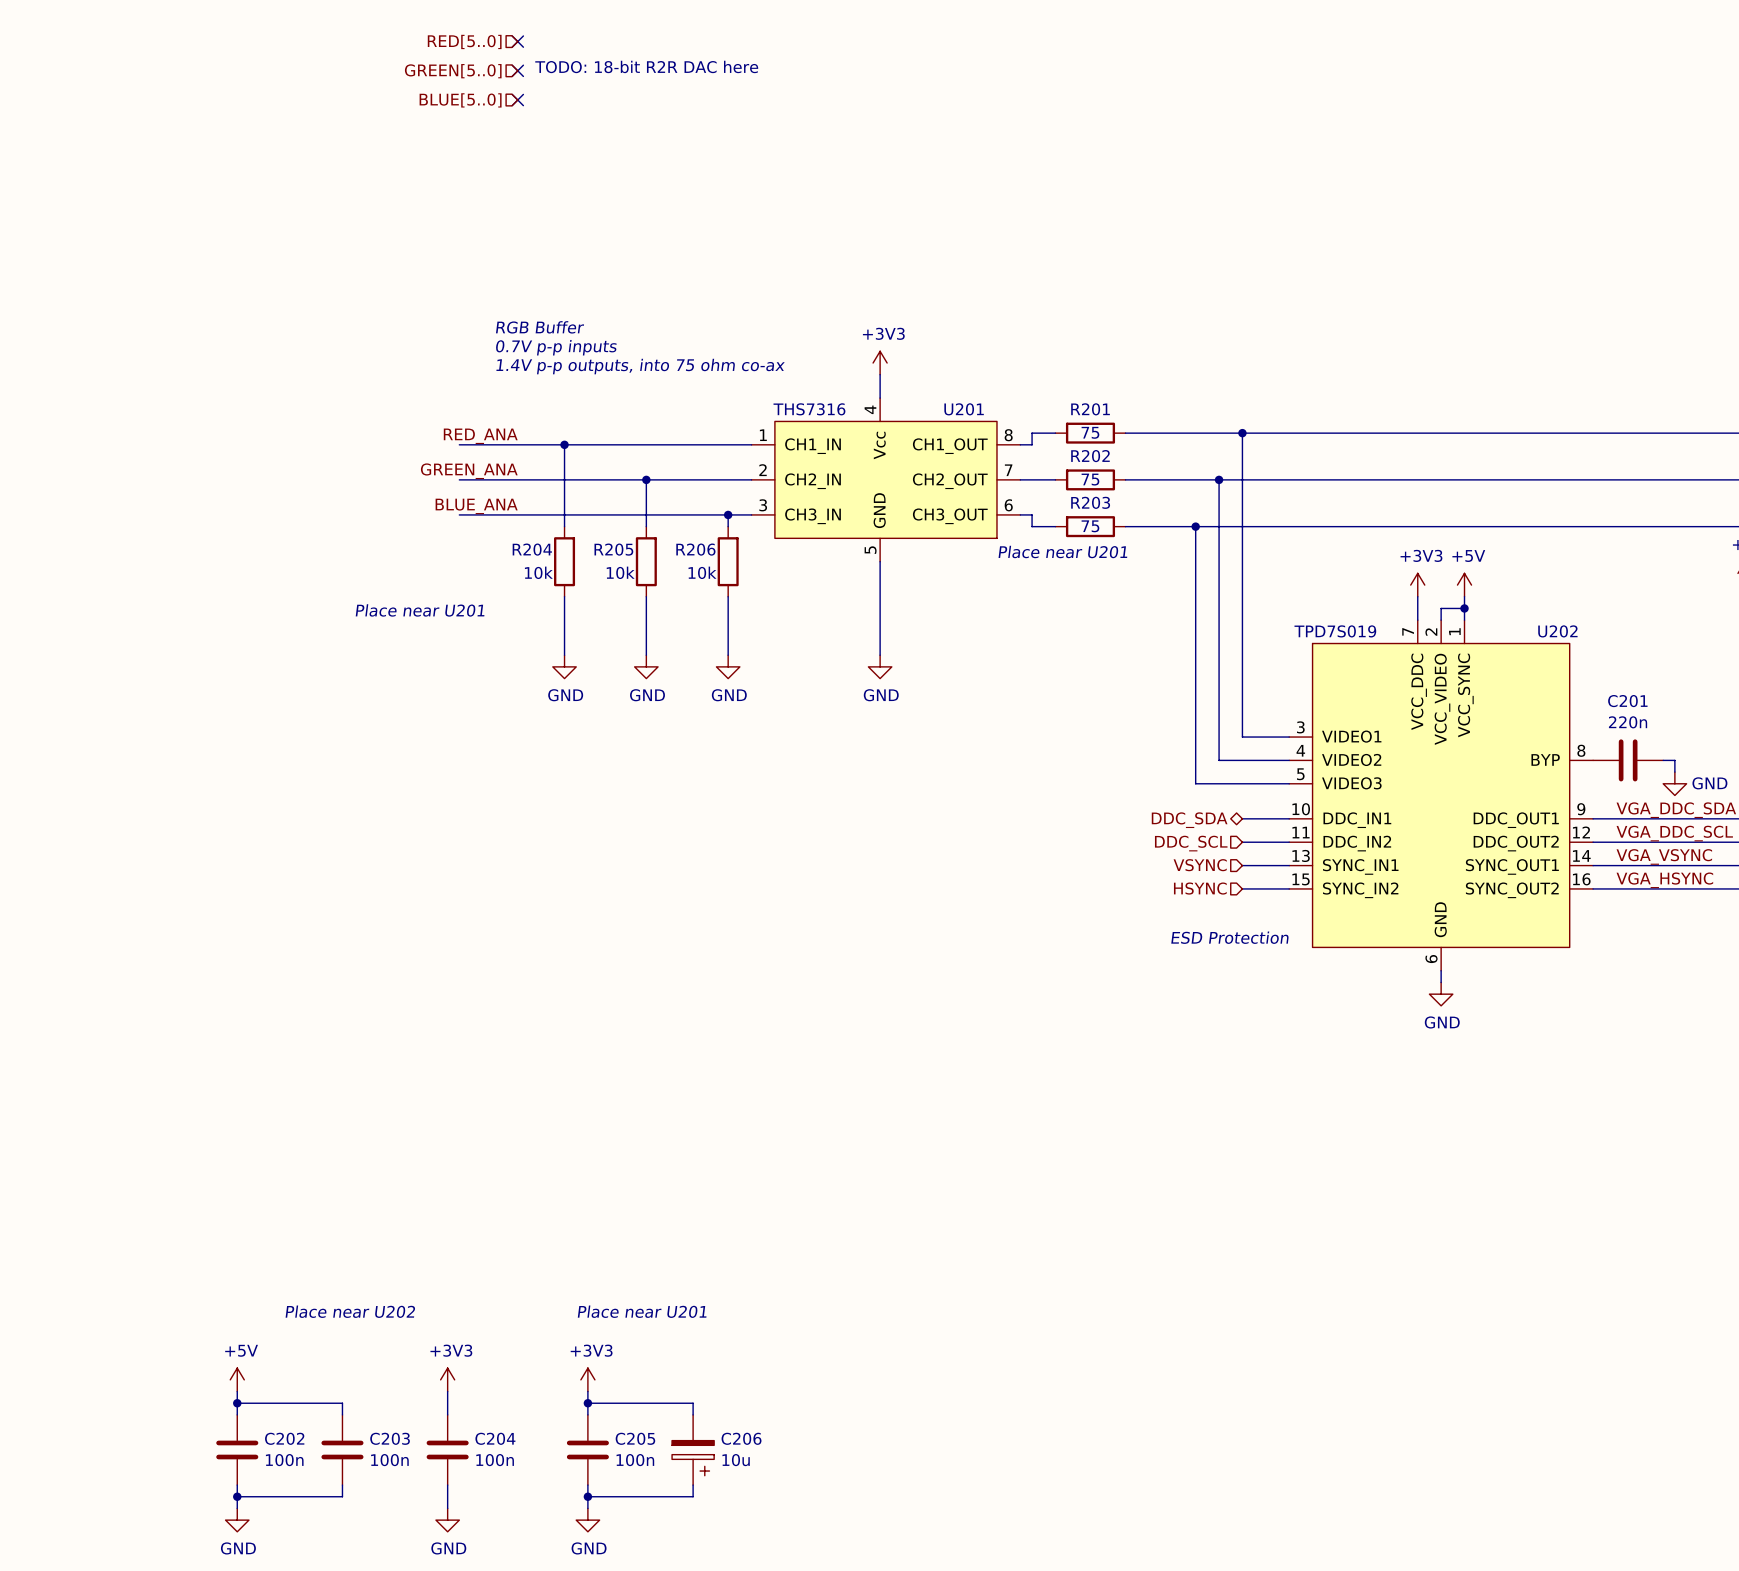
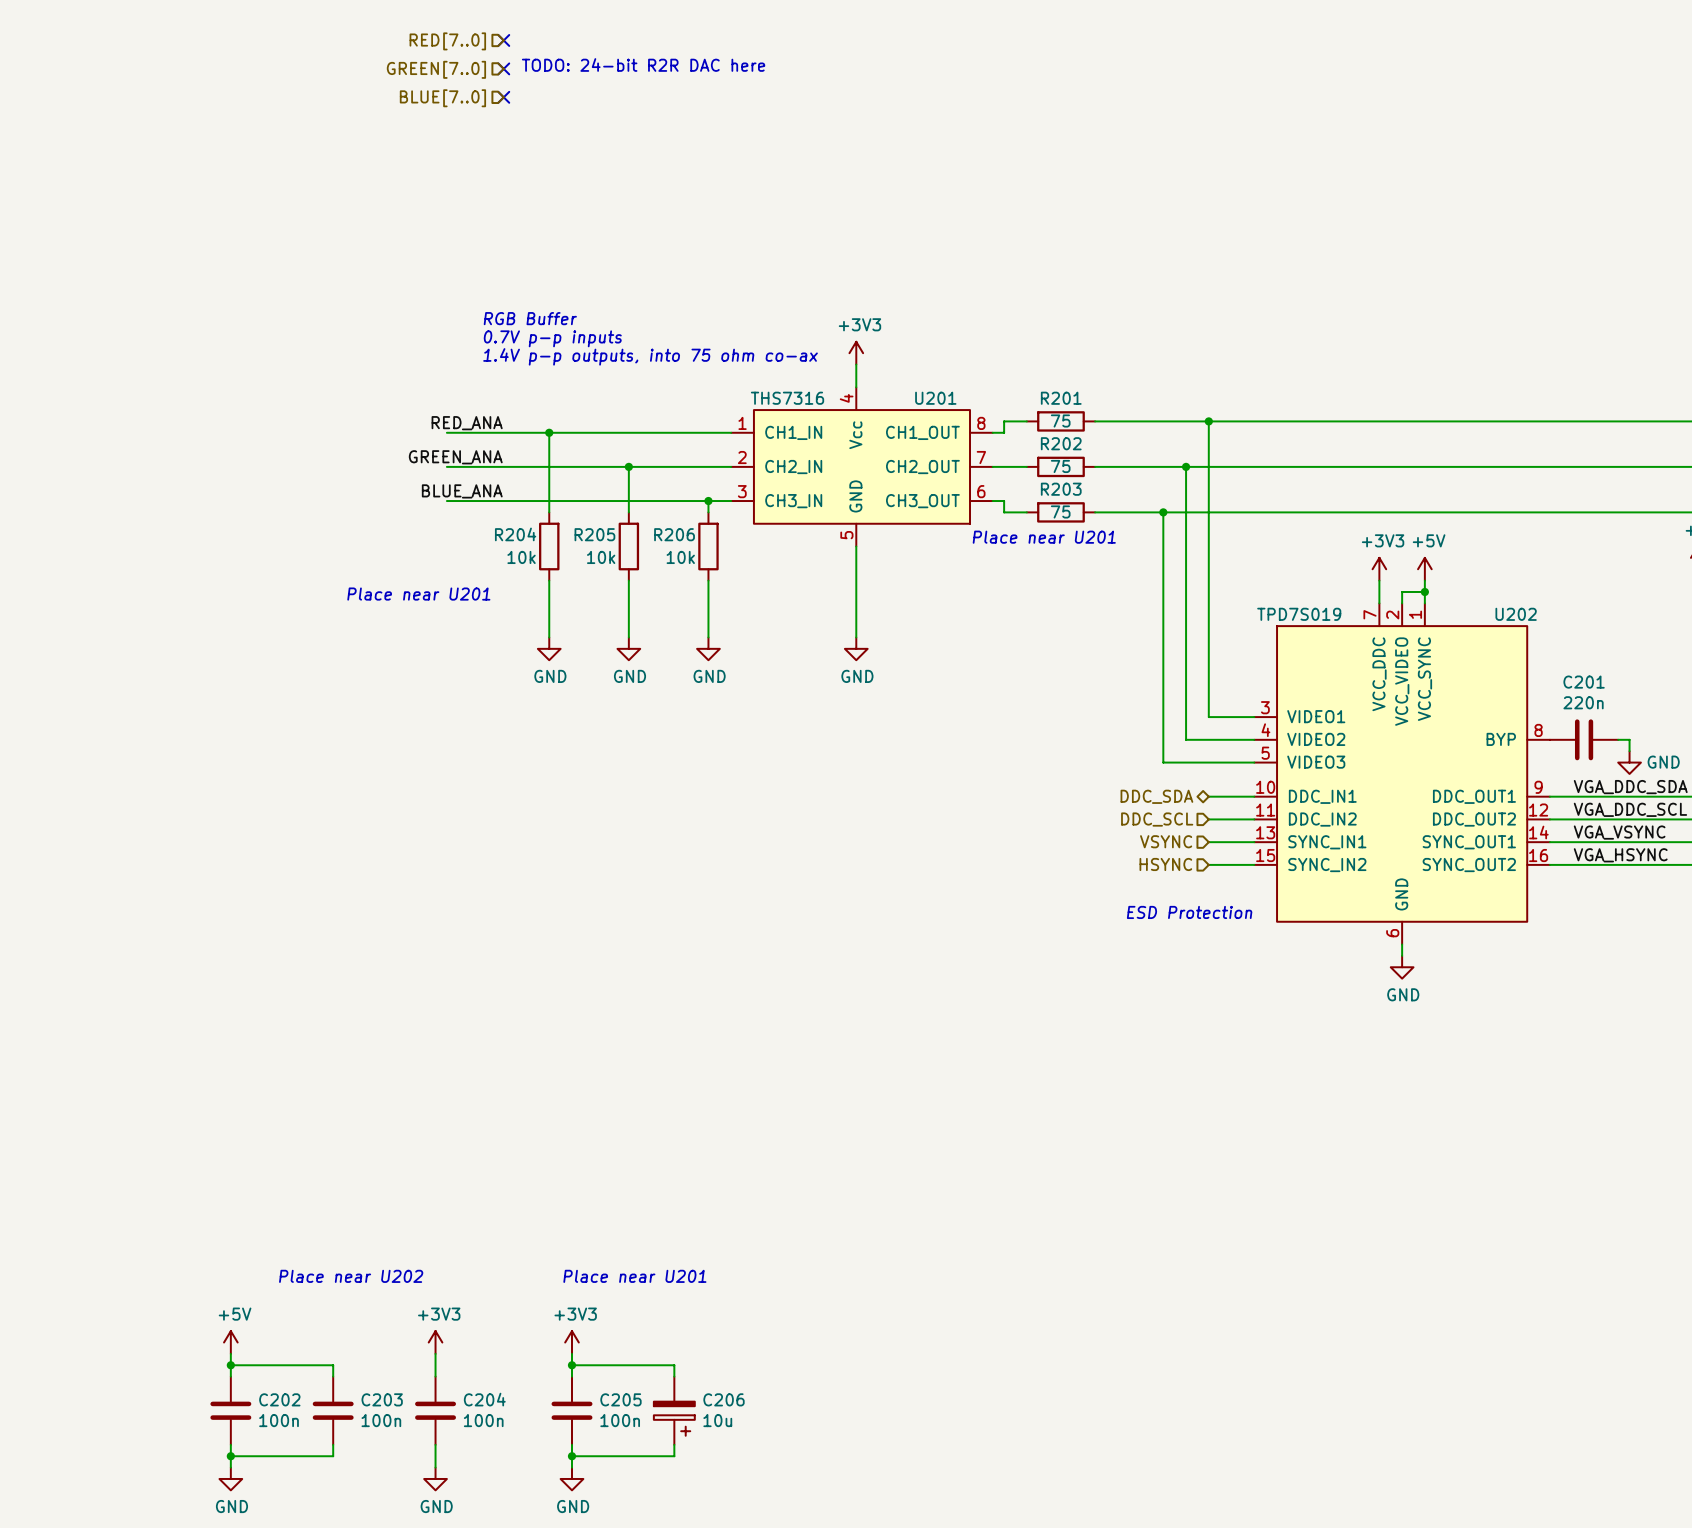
hierarchical label: RED[5..0] (464, 41) -> RED[7..0] (447, 41)
text: TODO: 18-bit R2R DAC here (646, 66) -> TODO: 24-bit R2R DAC here (643, 64)
hierarchical label: GREEN[5..0] (453, 71) -> GREEN[7..0] (436, 69)
hierarchical label: BLUE[5..0] (460, 100) -> BLUE[7..0] (442, 98)

